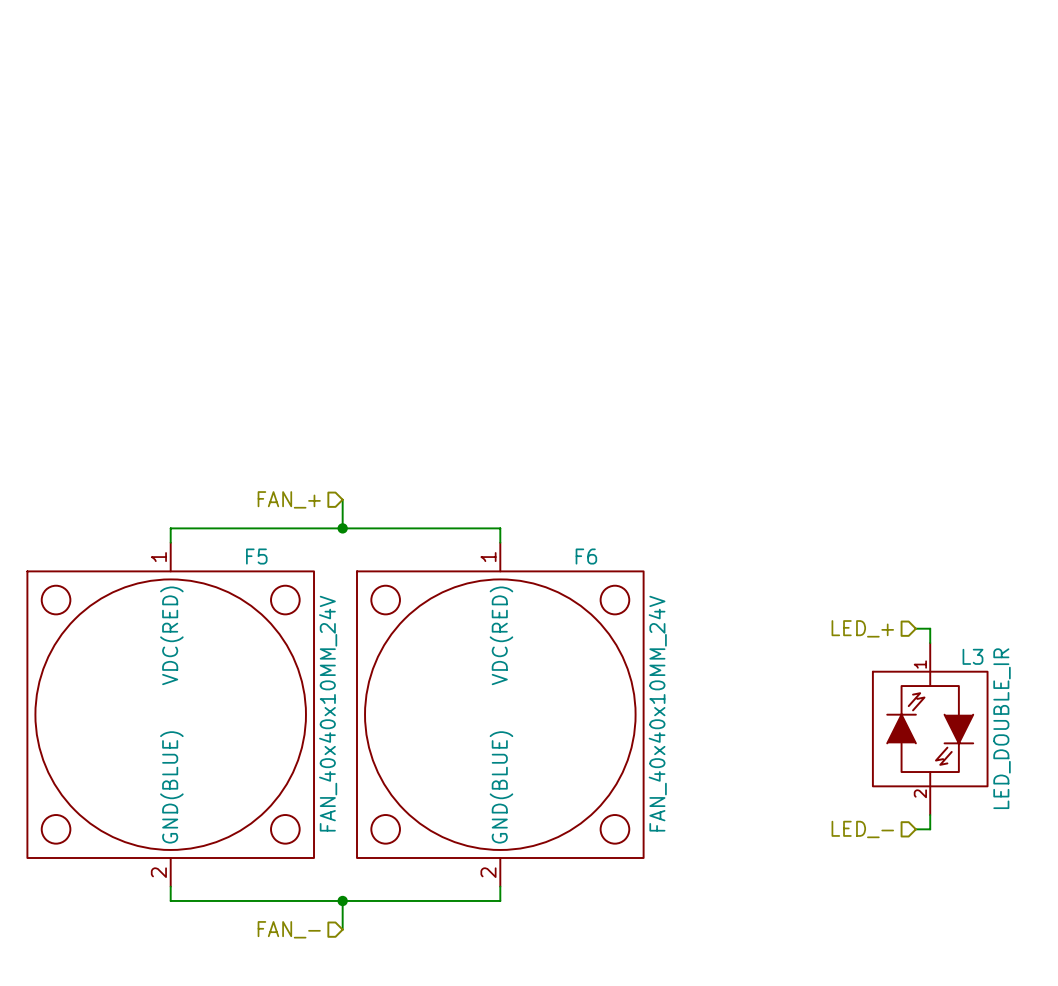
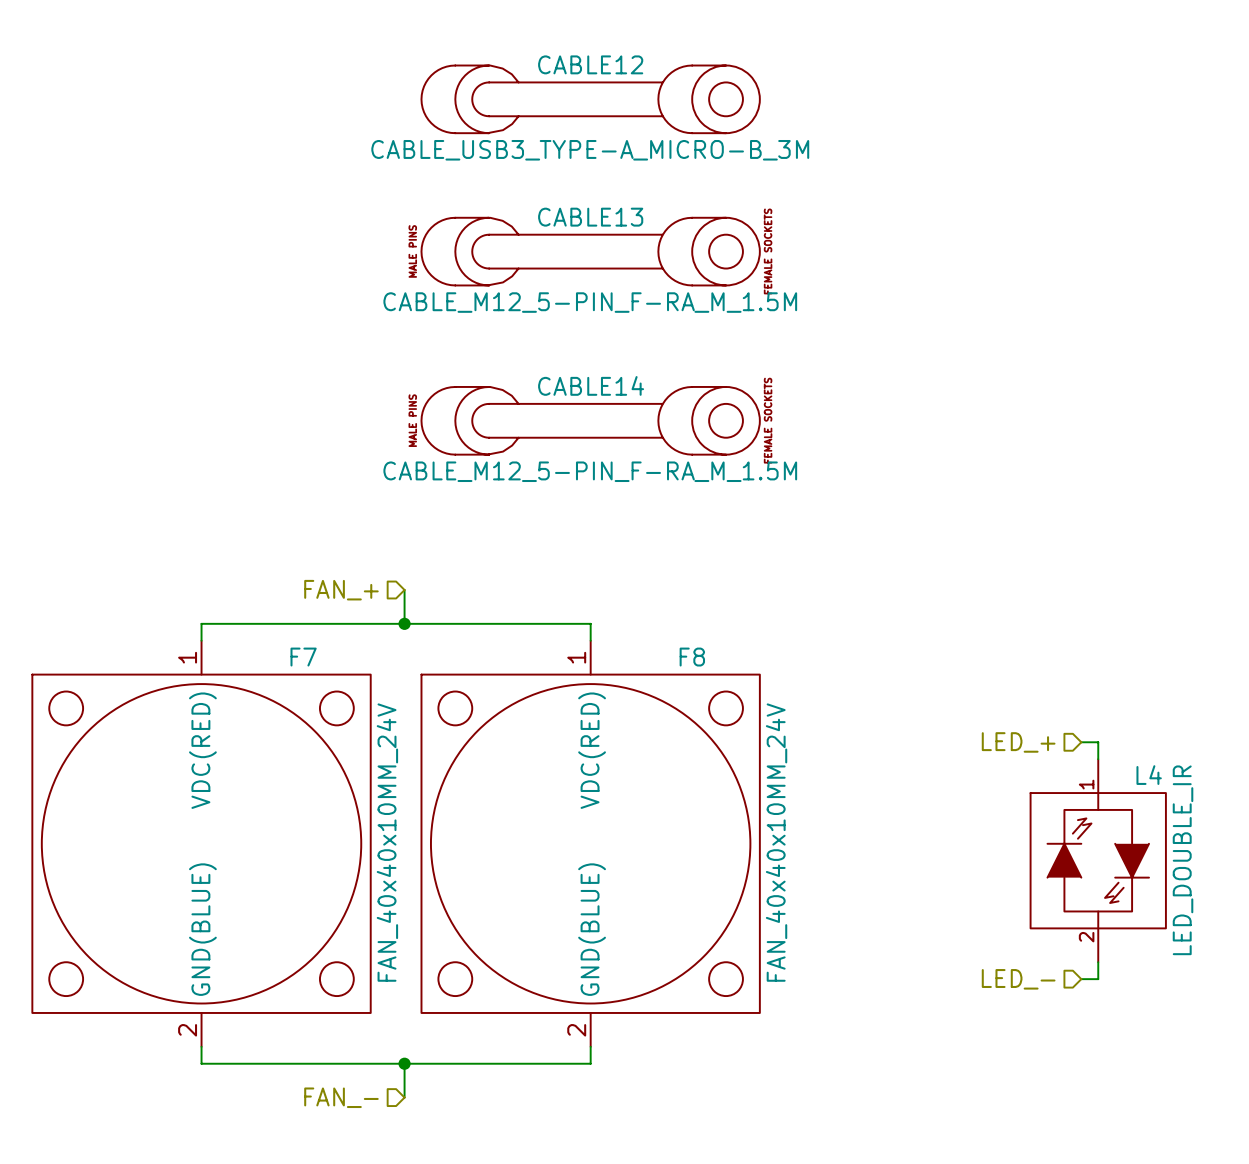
CABLE12: none -> CABLE_USB3_TYPE-A_MICRO-B_3M (590, 99)
CABLE13: none -> CABLE_M12_5-PIN_F-RA_M_1.5M (590, 251)
CABLE14: none -> CABLE_M12_5-PIN_F-RA_M_1.5M (590, 420)
F5 name: F5 (256, 556) -> F7 (303, 657)
F6 name: F6 (586, 556) -> F8 (692, 657)
L3 name: L3 (972, 656) -> L4 (1149, 775)

